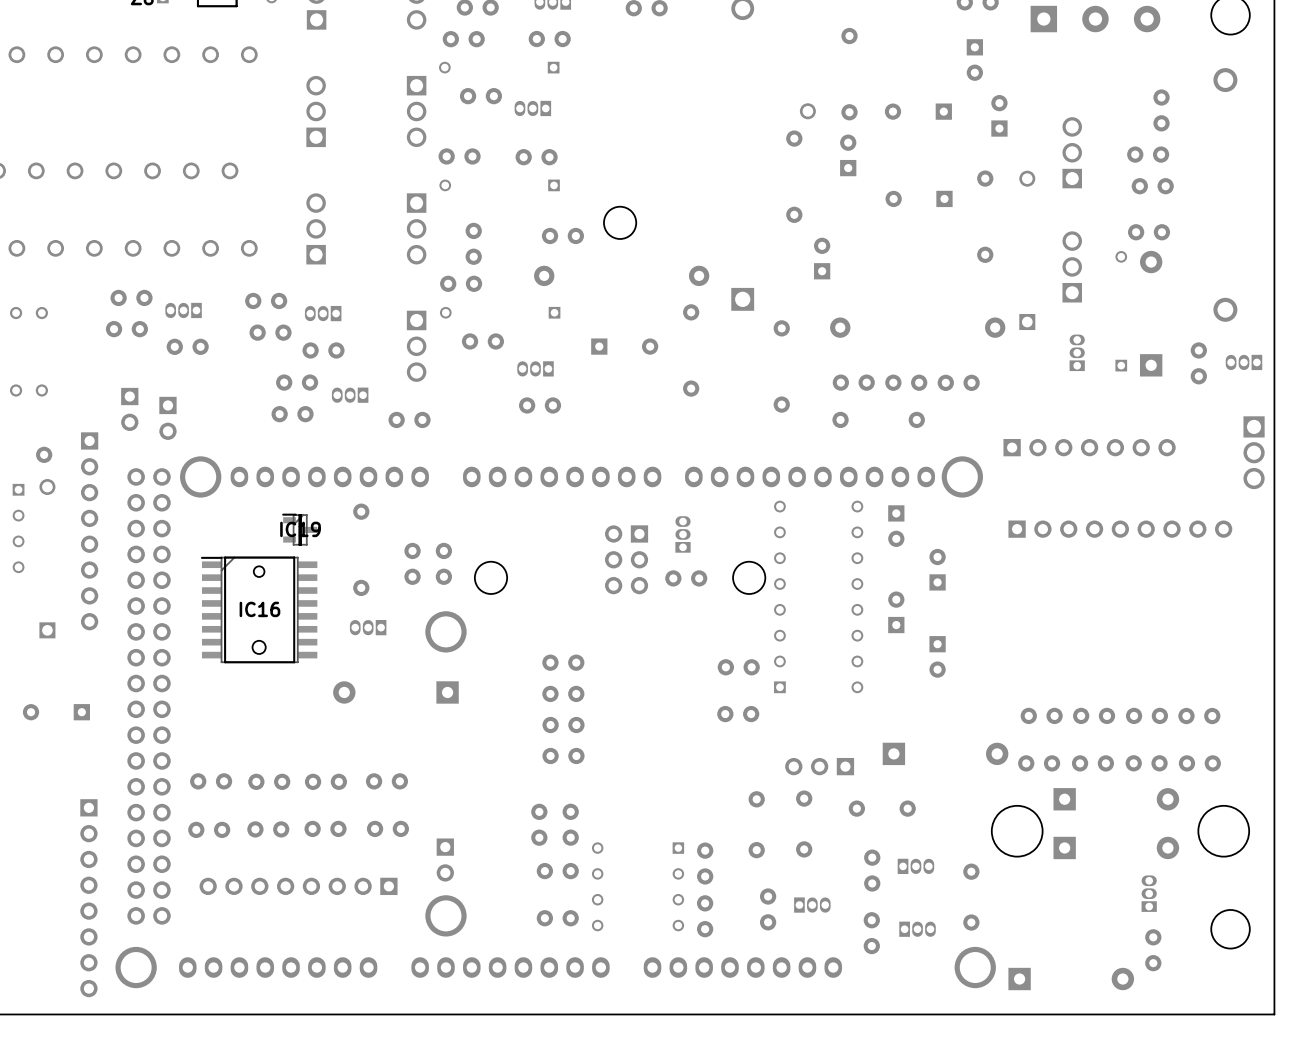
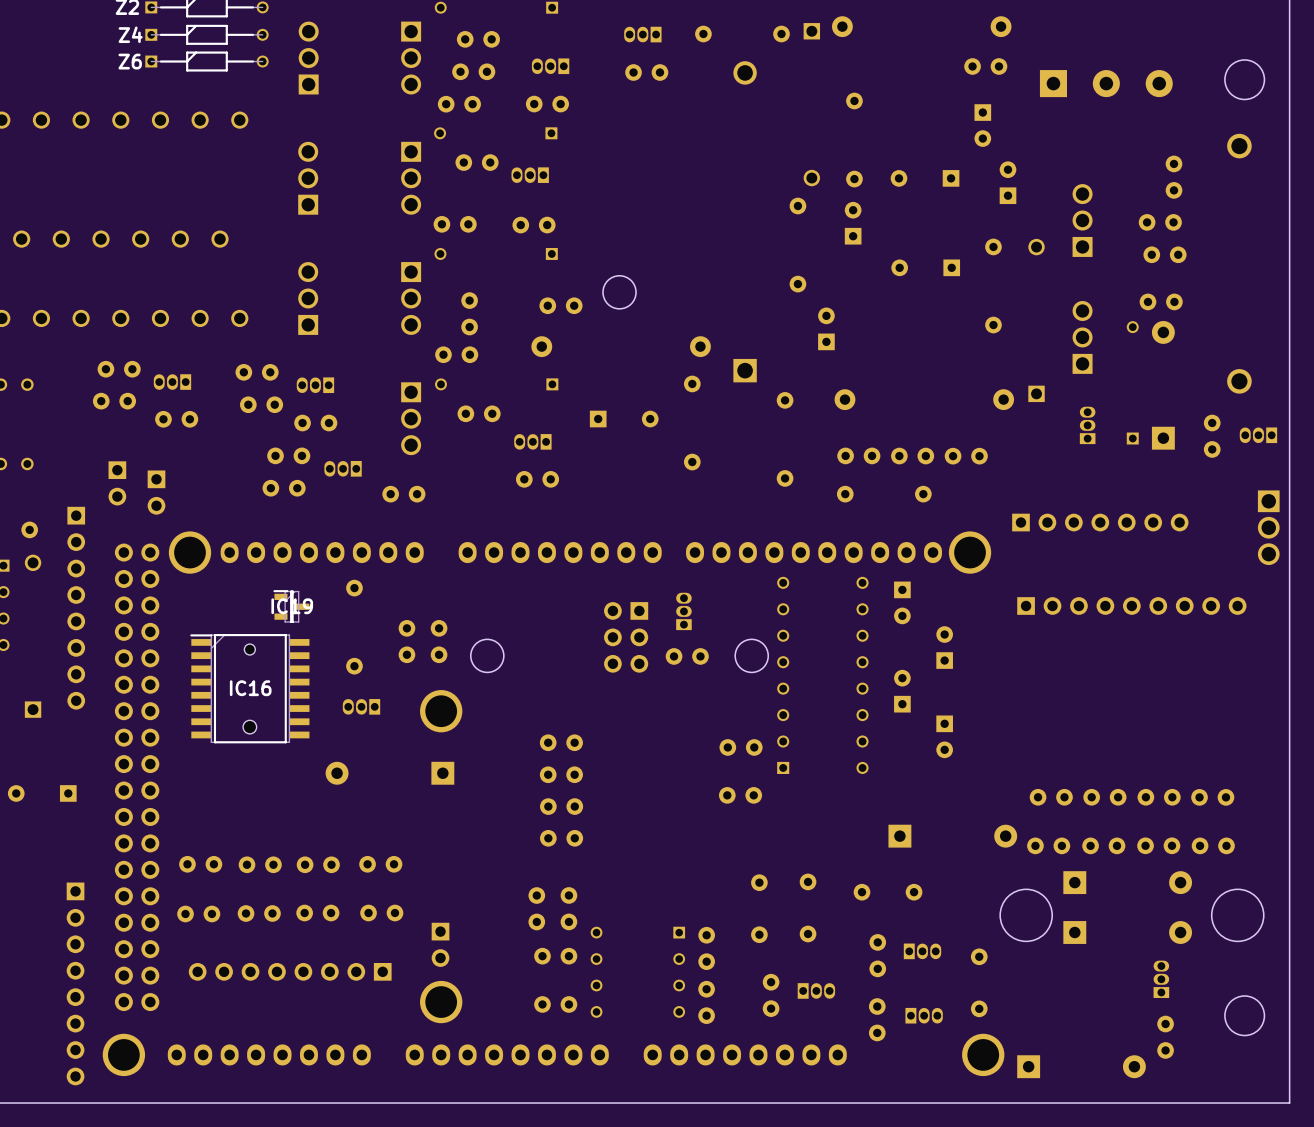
part: (819, 766) -> none

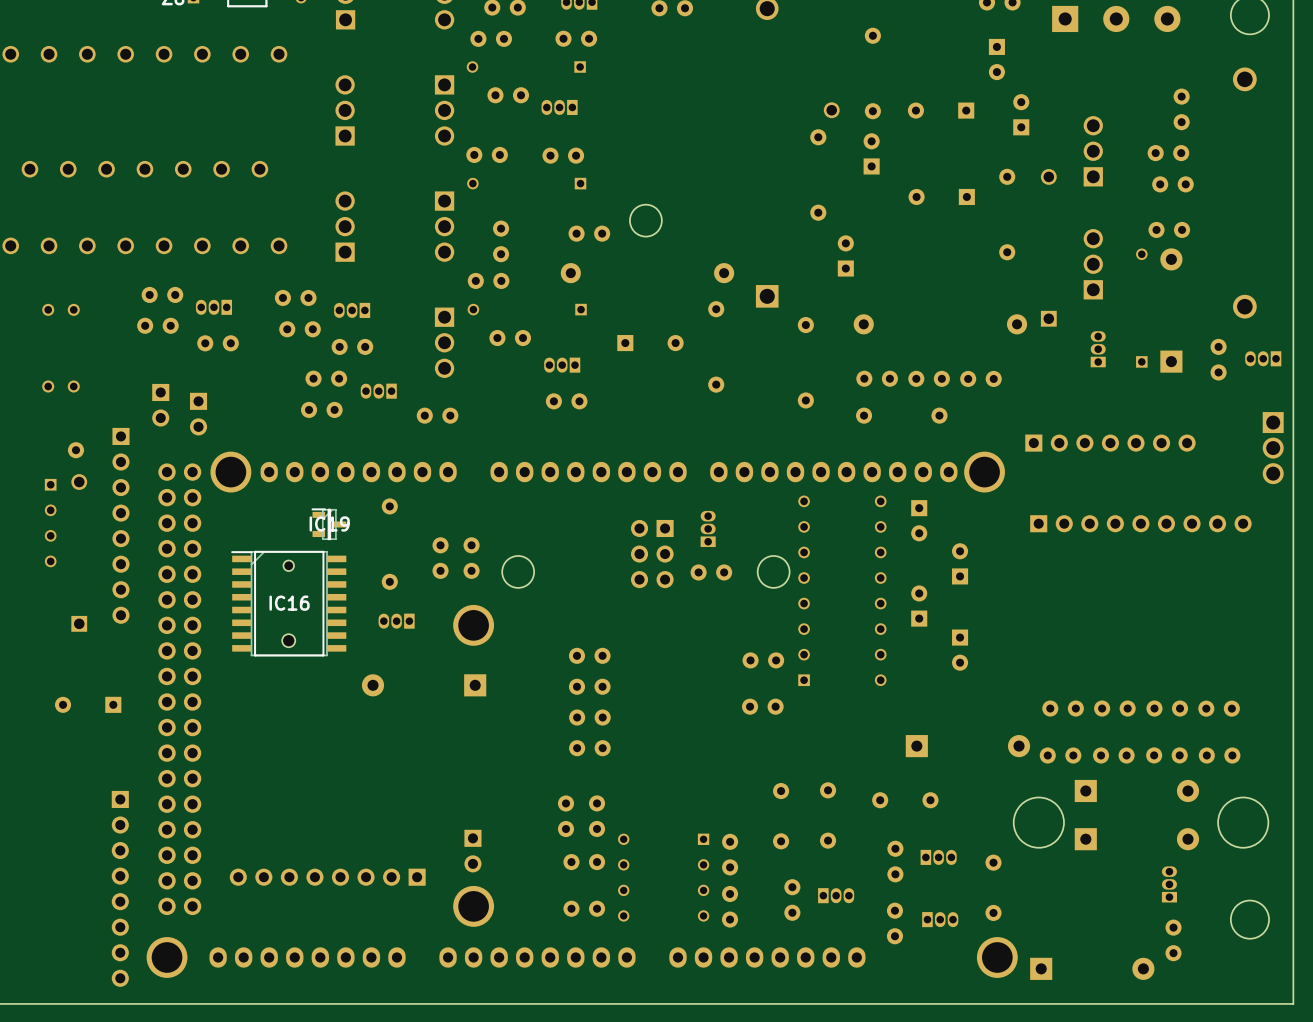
part: (200, 864) -> none
part: (260, 864) -> none
part: (318, 864) -> none
part: (380, 864) -> none
part: (198, 913) -> none
part: (259, 913) -> none
part: (317, 913) -> none
part: (381, 913) -> none

